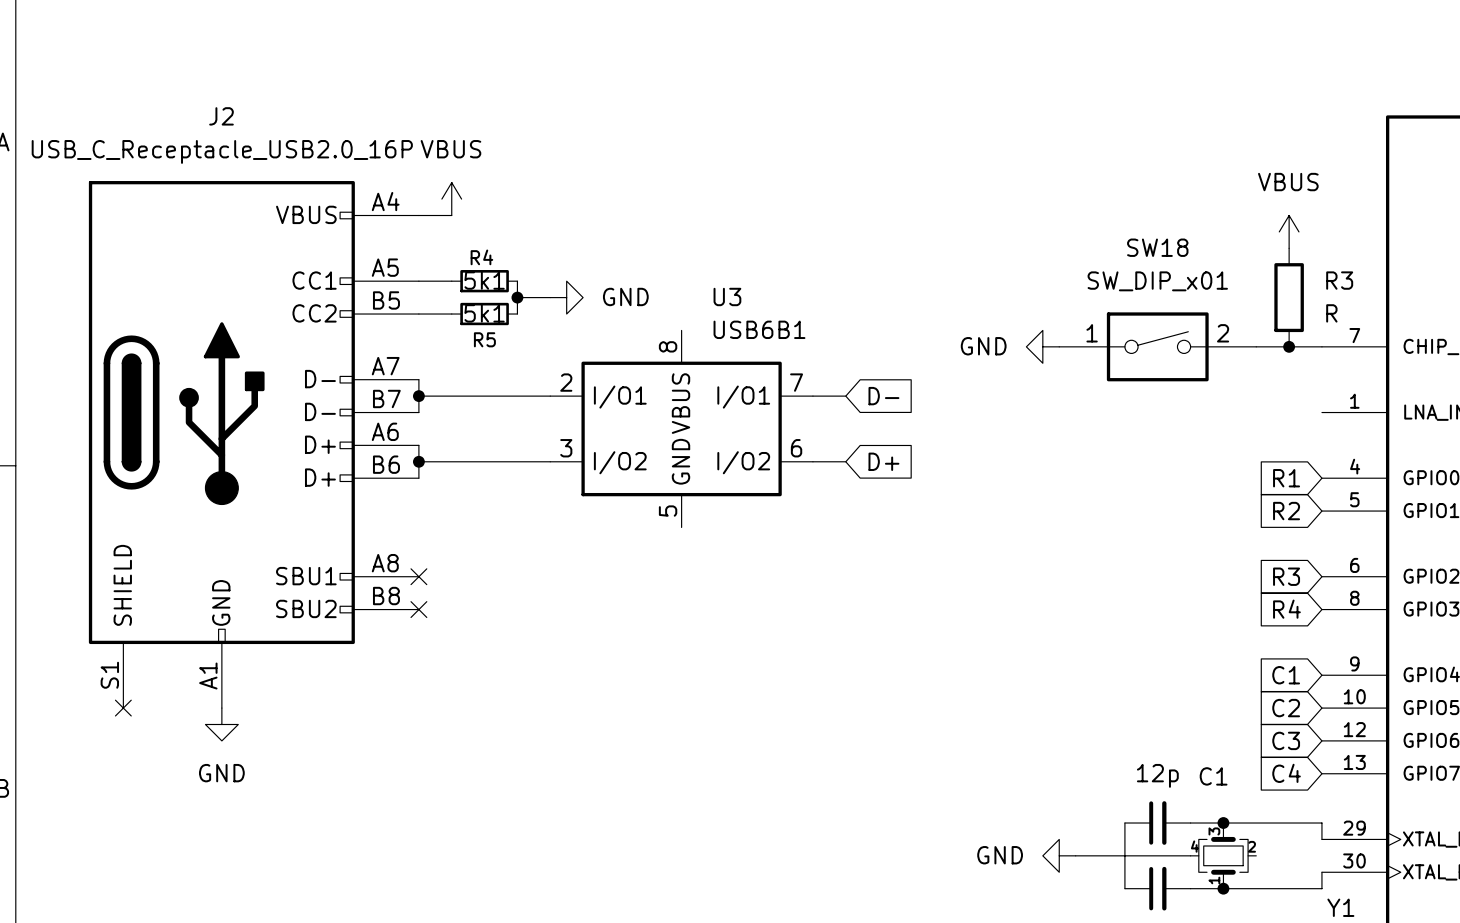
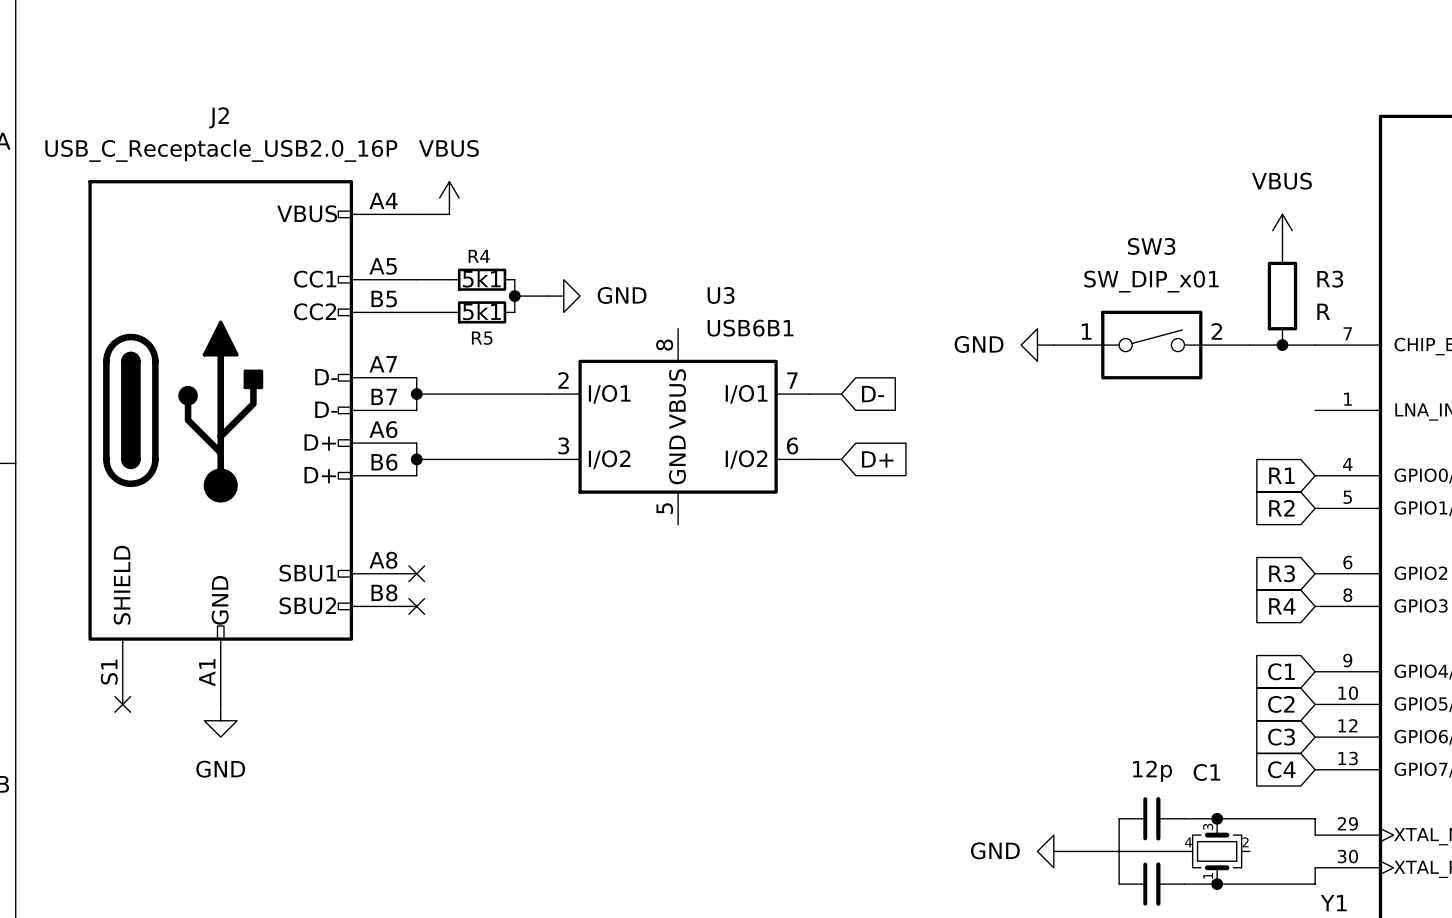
SW18 name: SW18 (1157, 247) -> SW3 (1151, 246)

